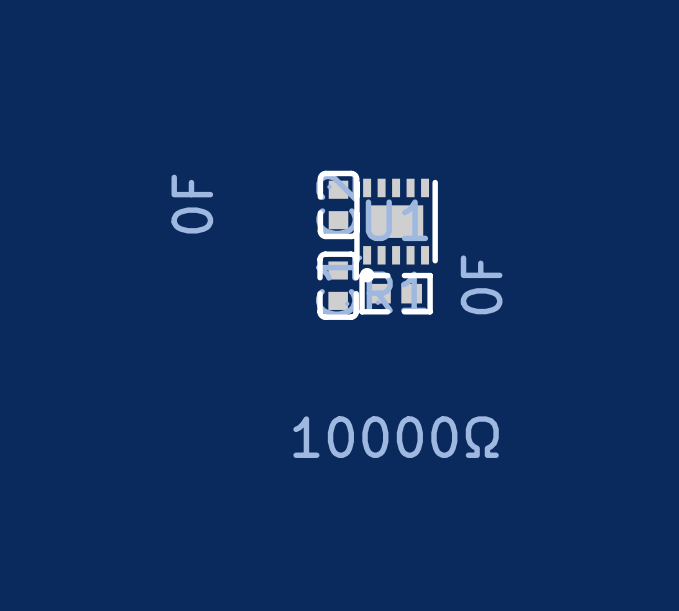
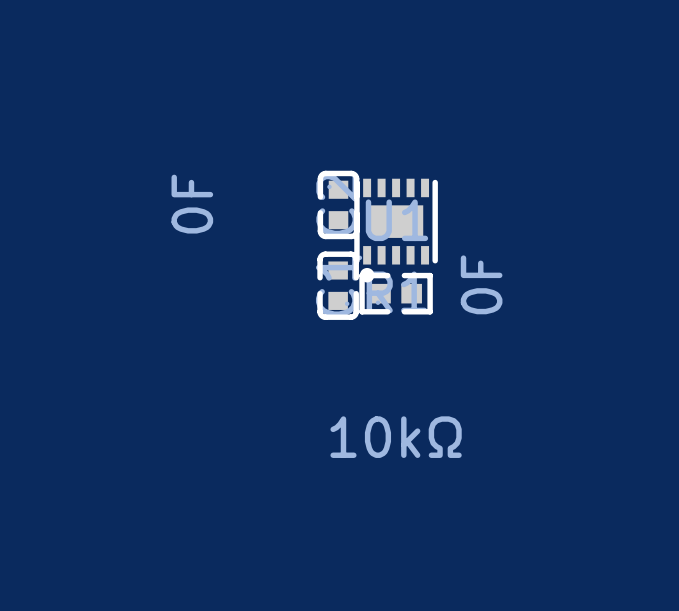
part value: 10000Ω (396, 437) -> 10kΩ (396, 437)

